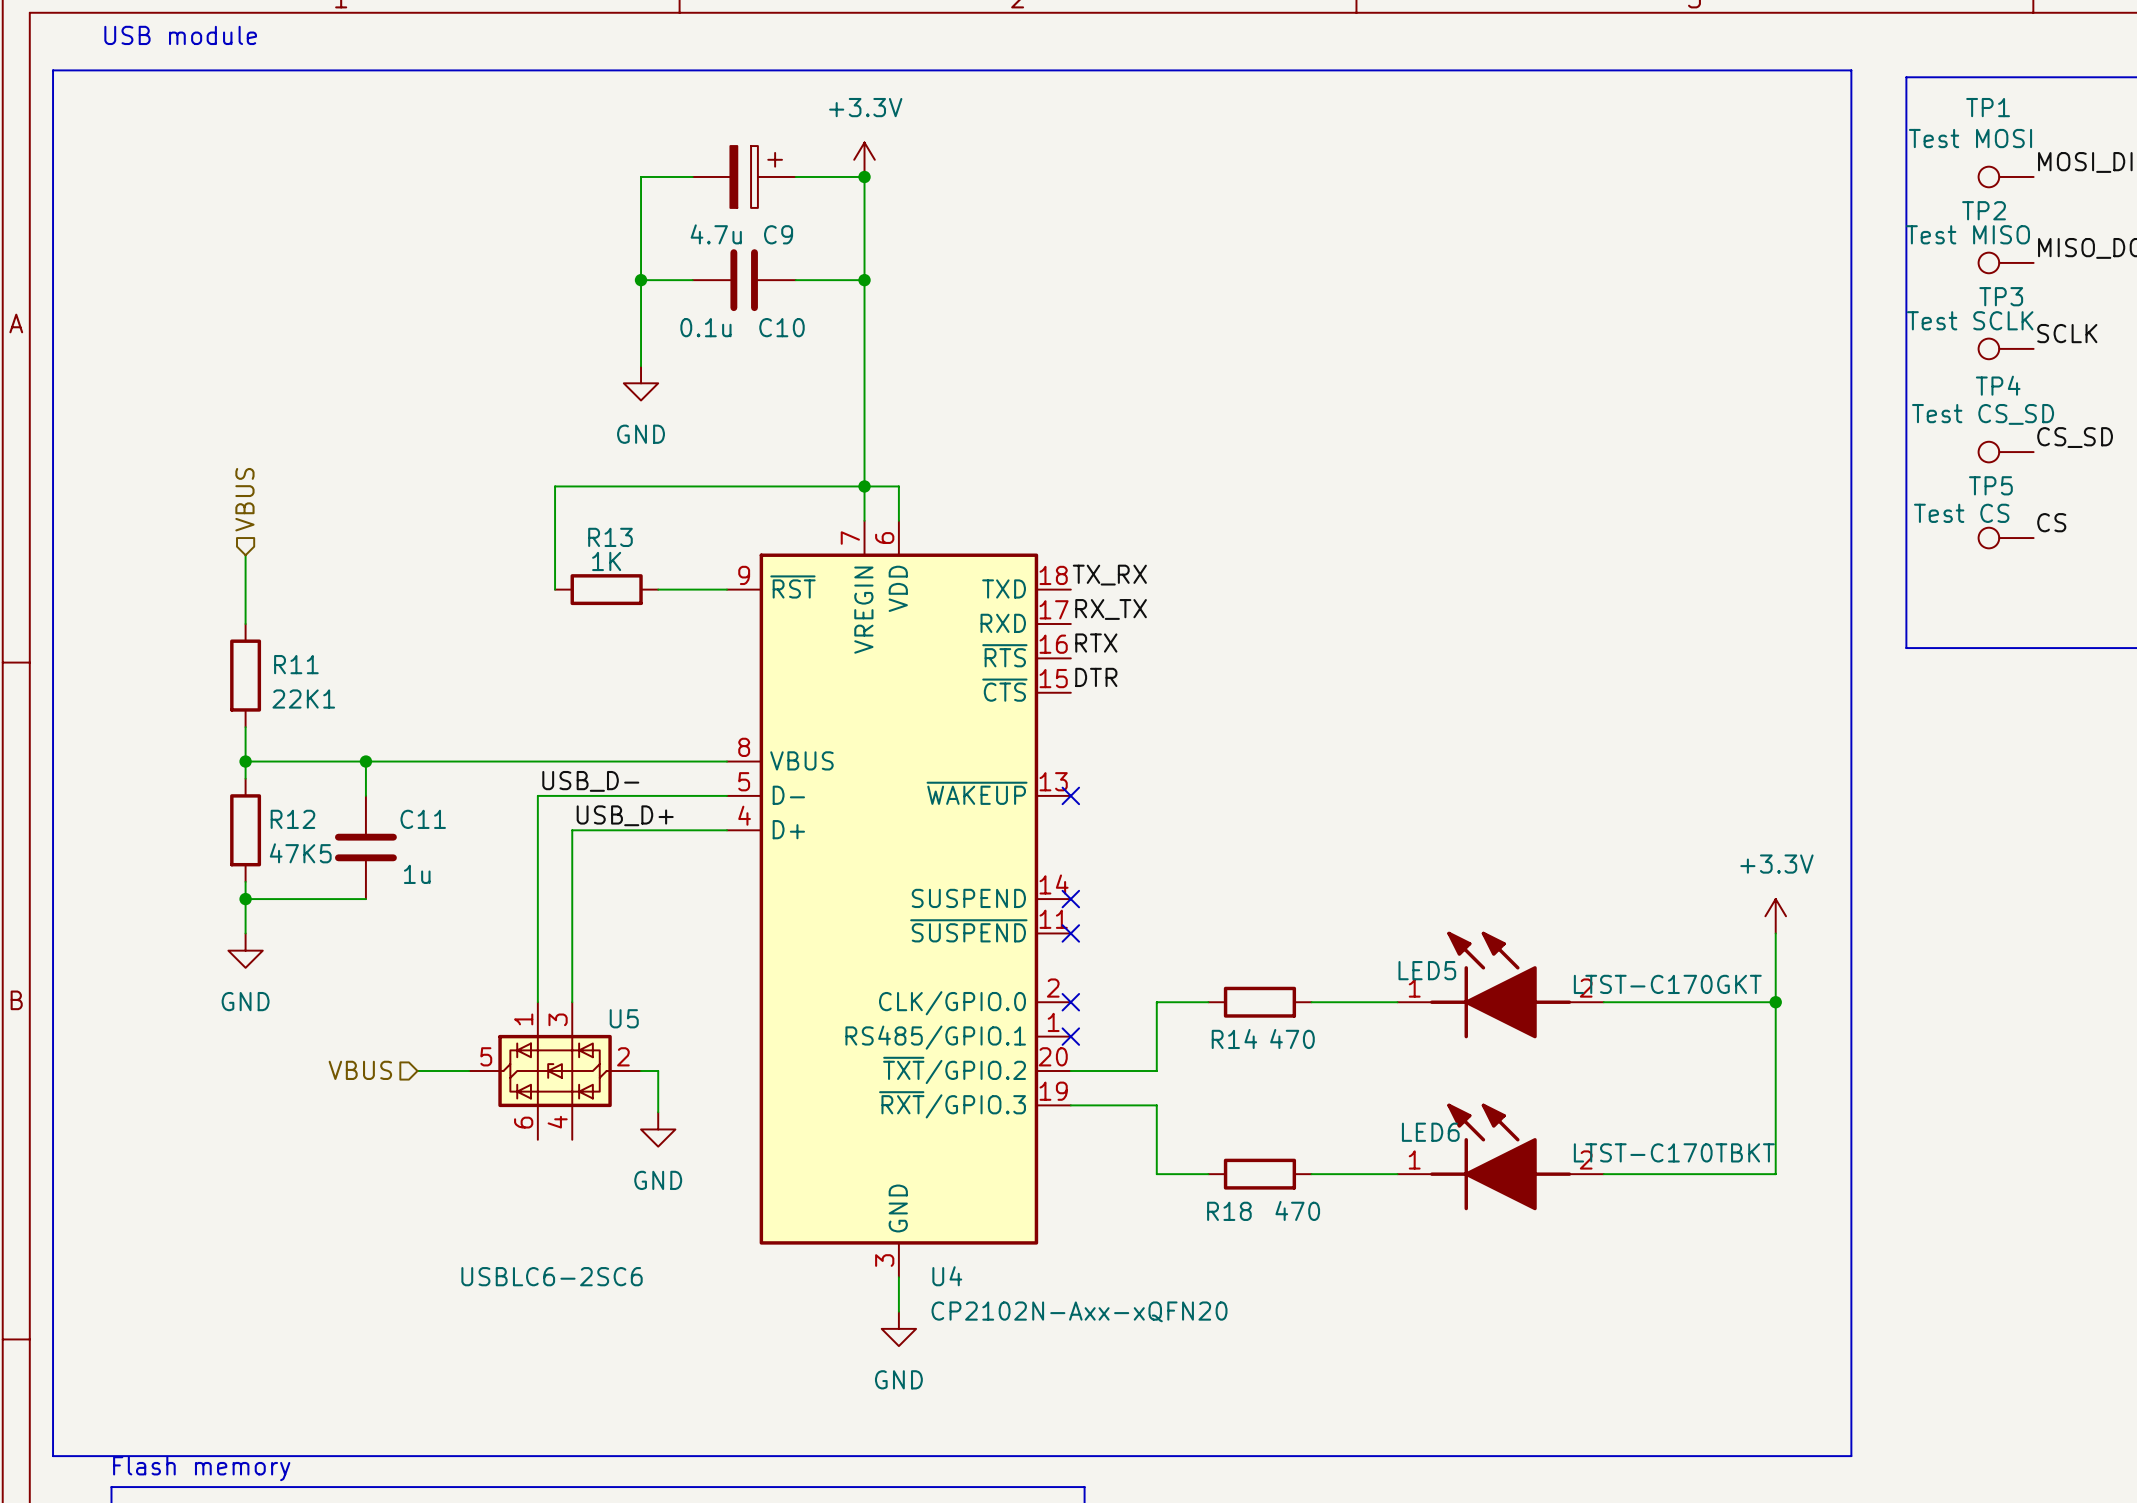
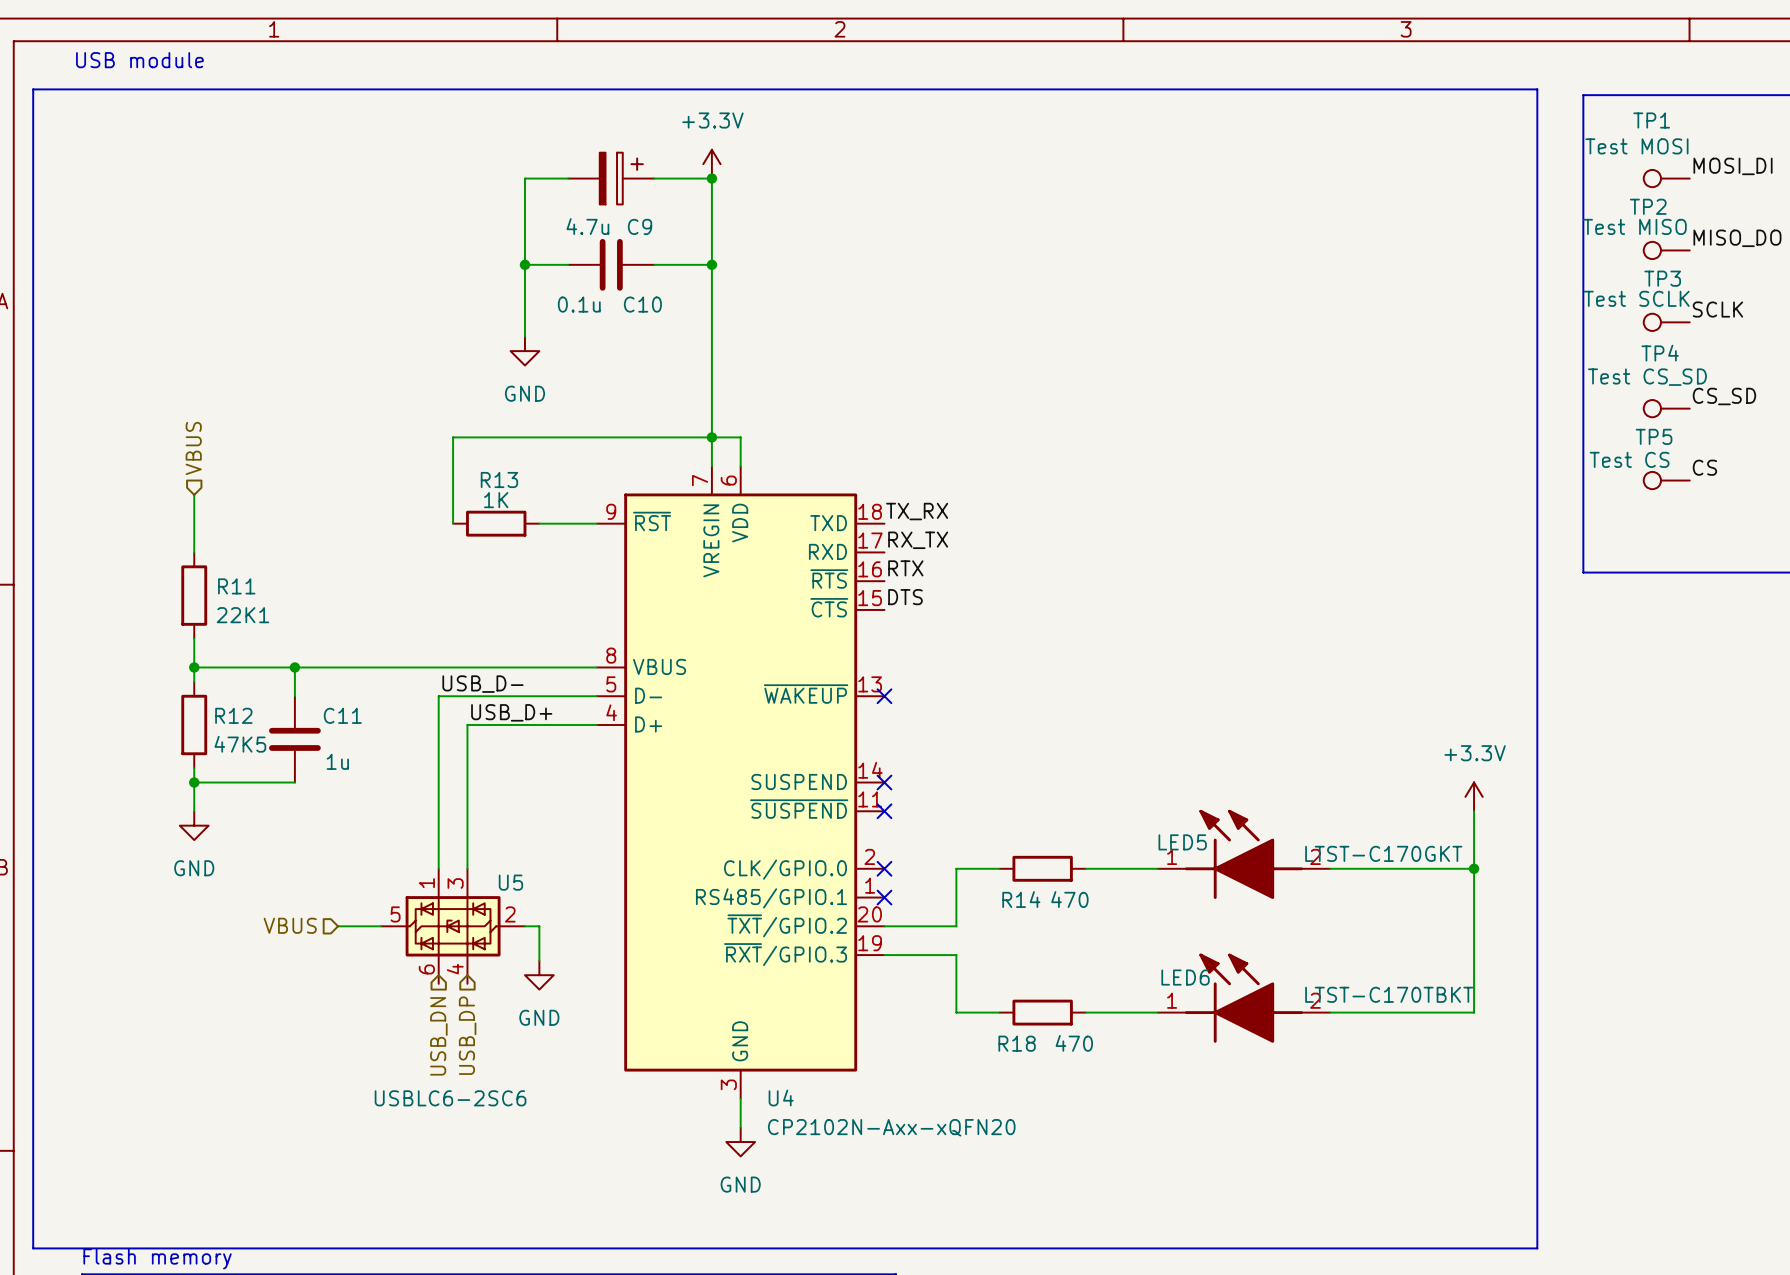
label: DTR (1096, 677) -> DTS (905, 597)
hierarchical label: none -> USB_DP (467, 1035)
hierarchical label: none -> USB_DN (438, 1036)

